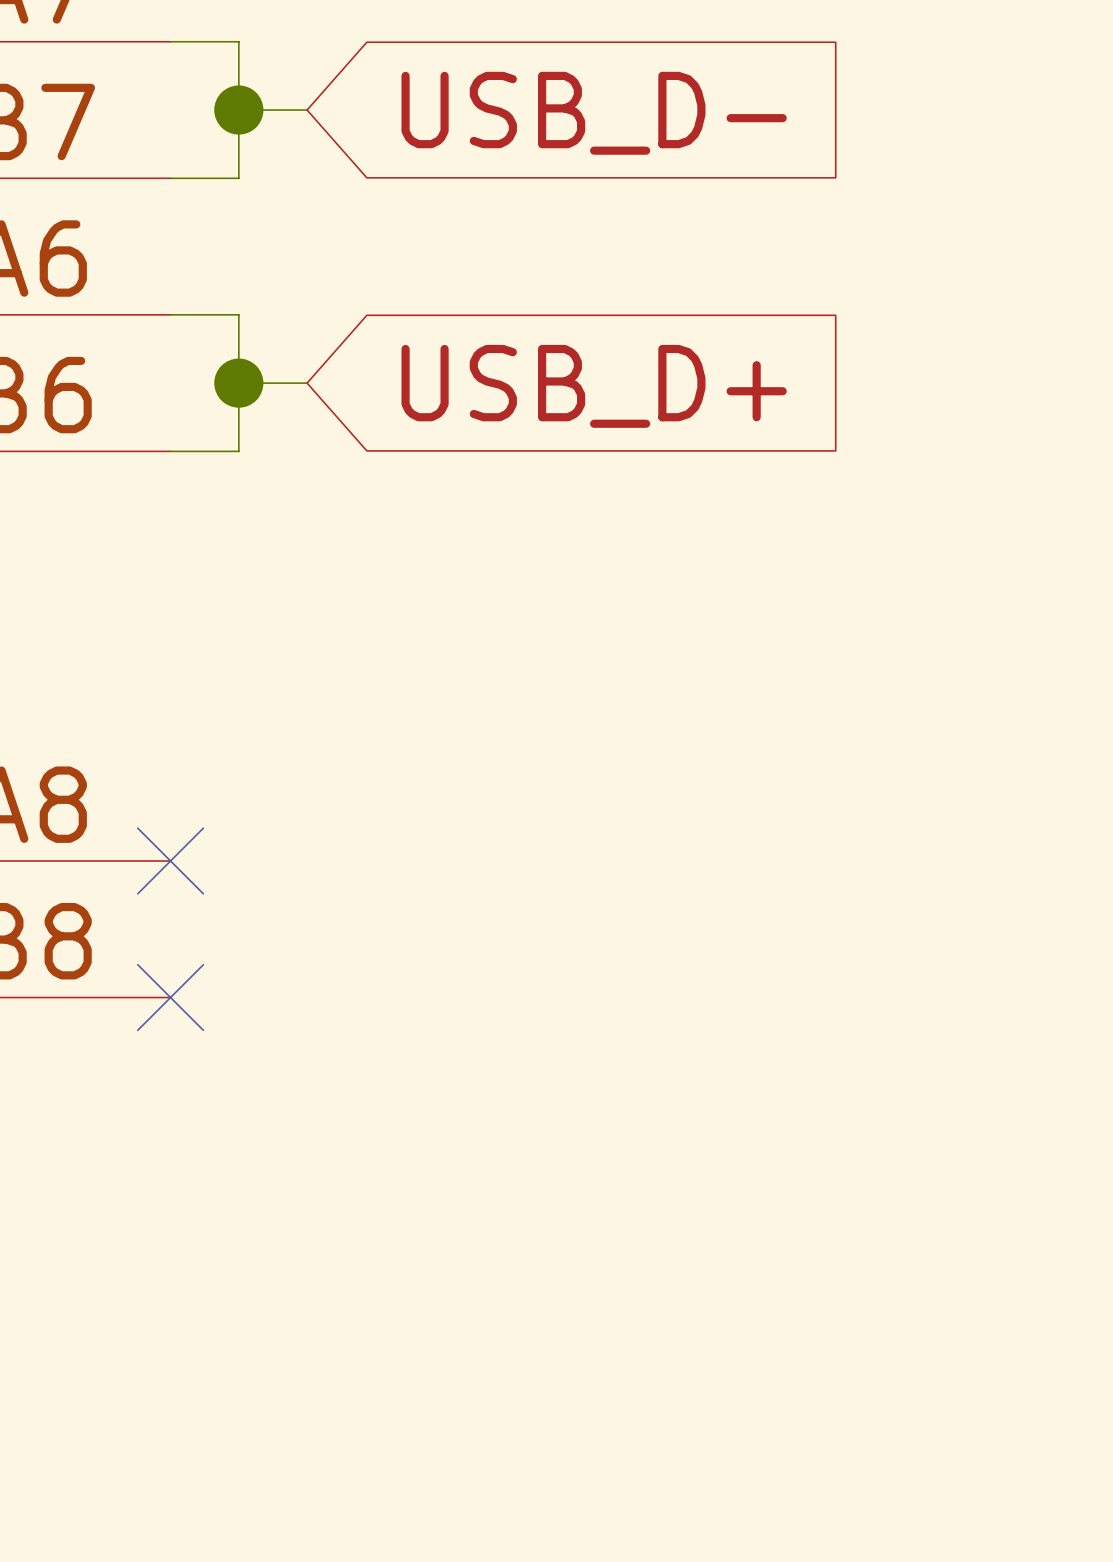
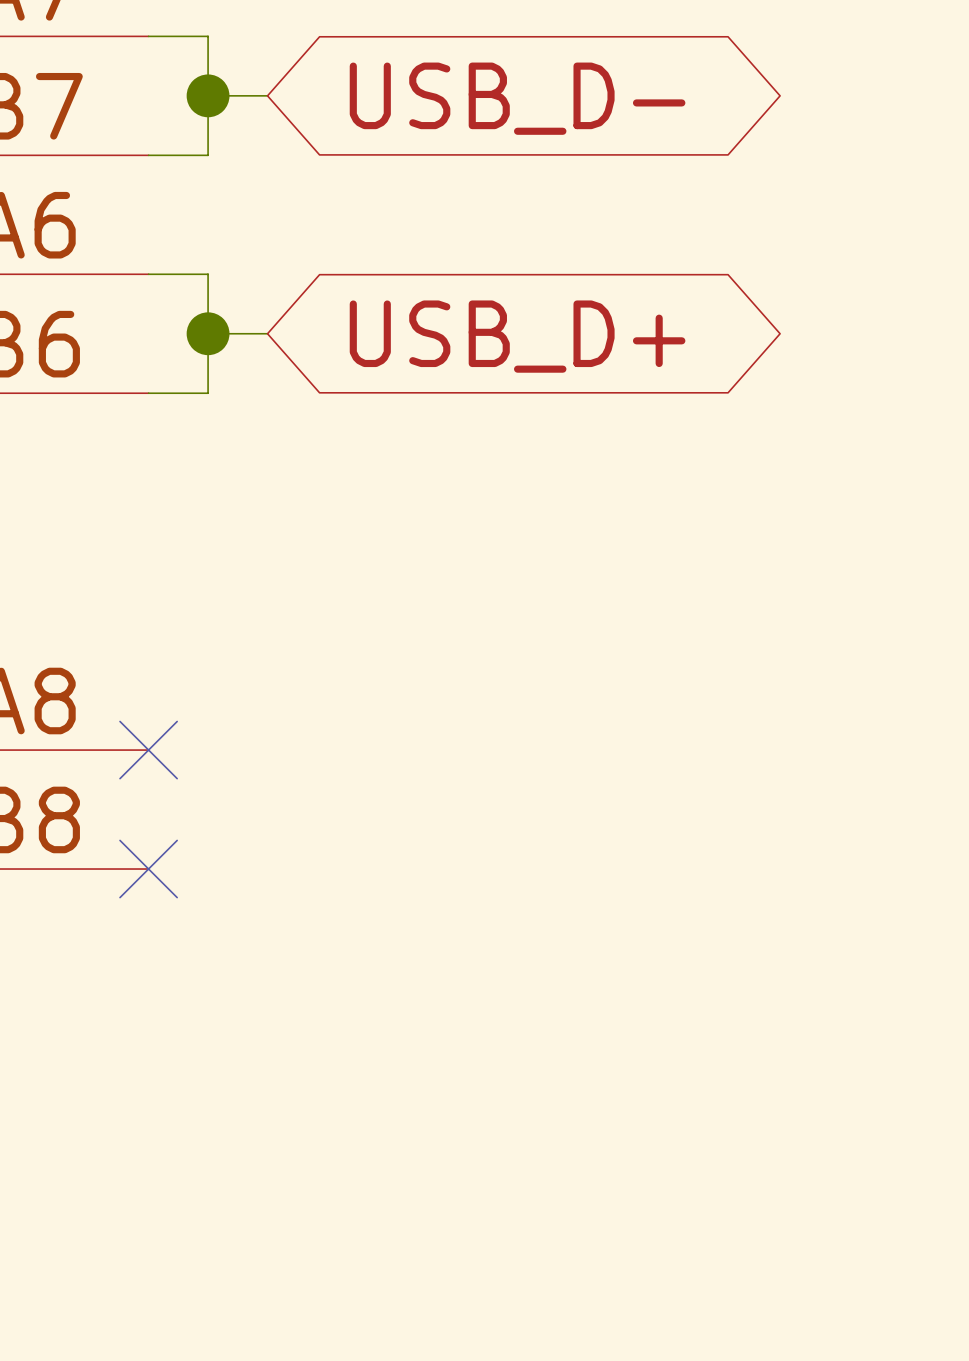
global label shape: input (594, 113) -> bidirectional (517, 98)
global label shape: input (594, 386) -> bidirectional (517, 336)

